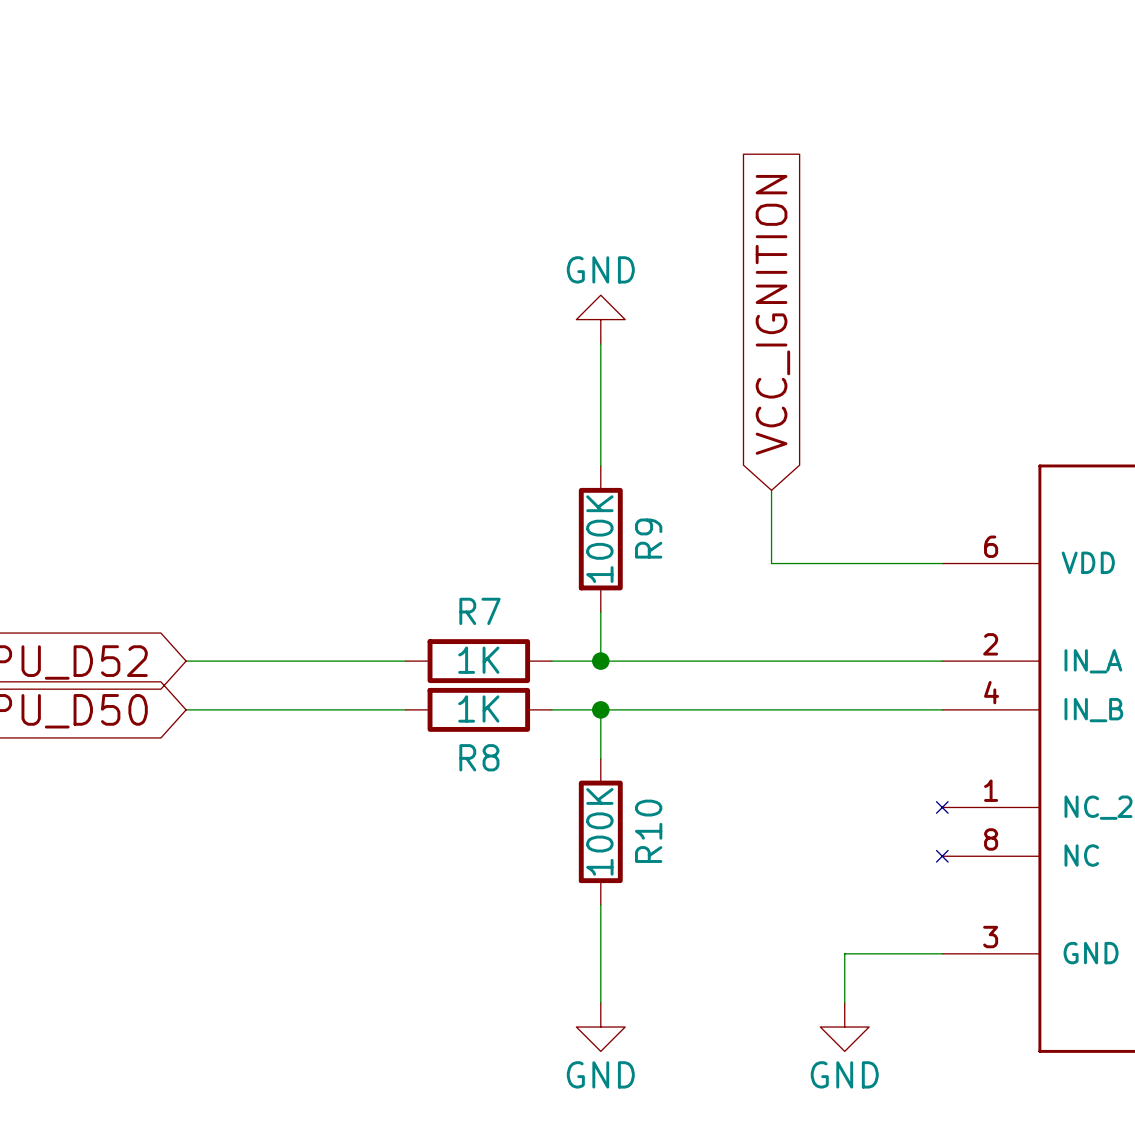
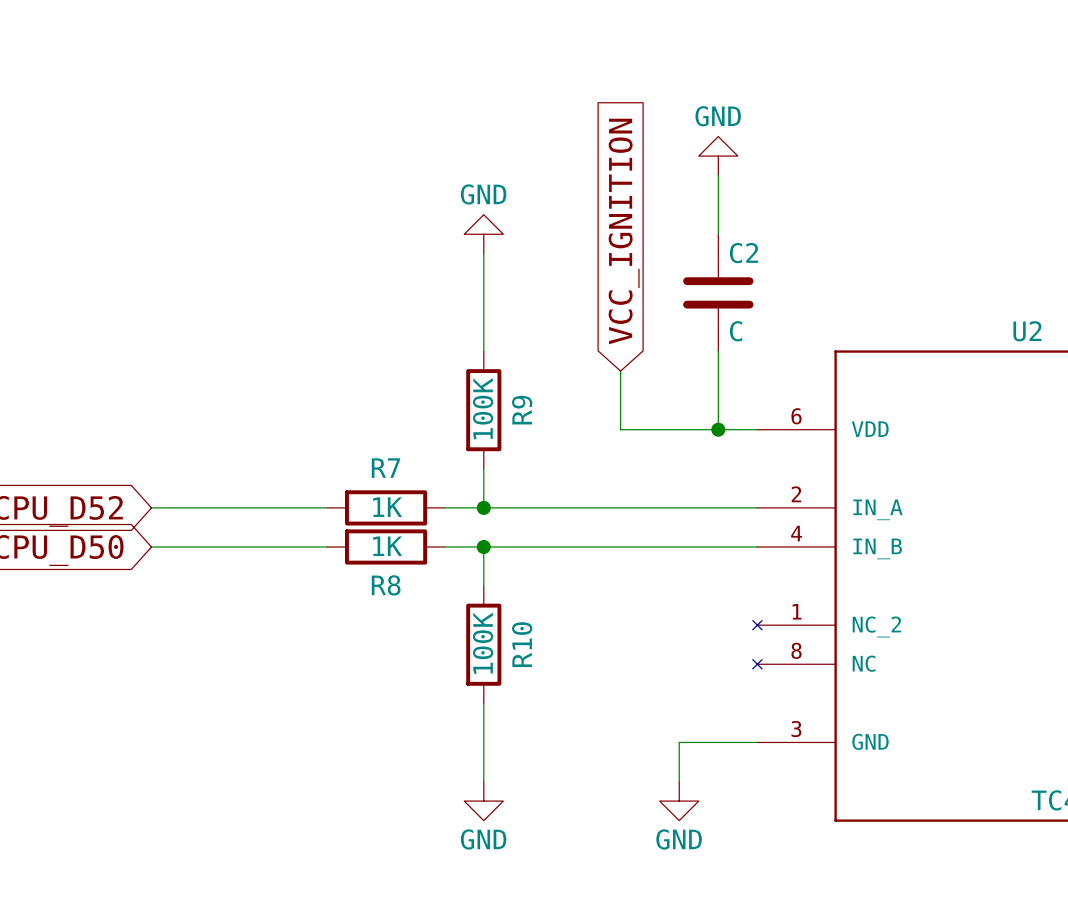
power symbol: none -> GND (718, 156)
wire: none -> (718, 175) (718, 234)
C2: none -> C (718, 292)
wire: none -> (718, 351) (718, 429)
junction: none -> (718, 429)

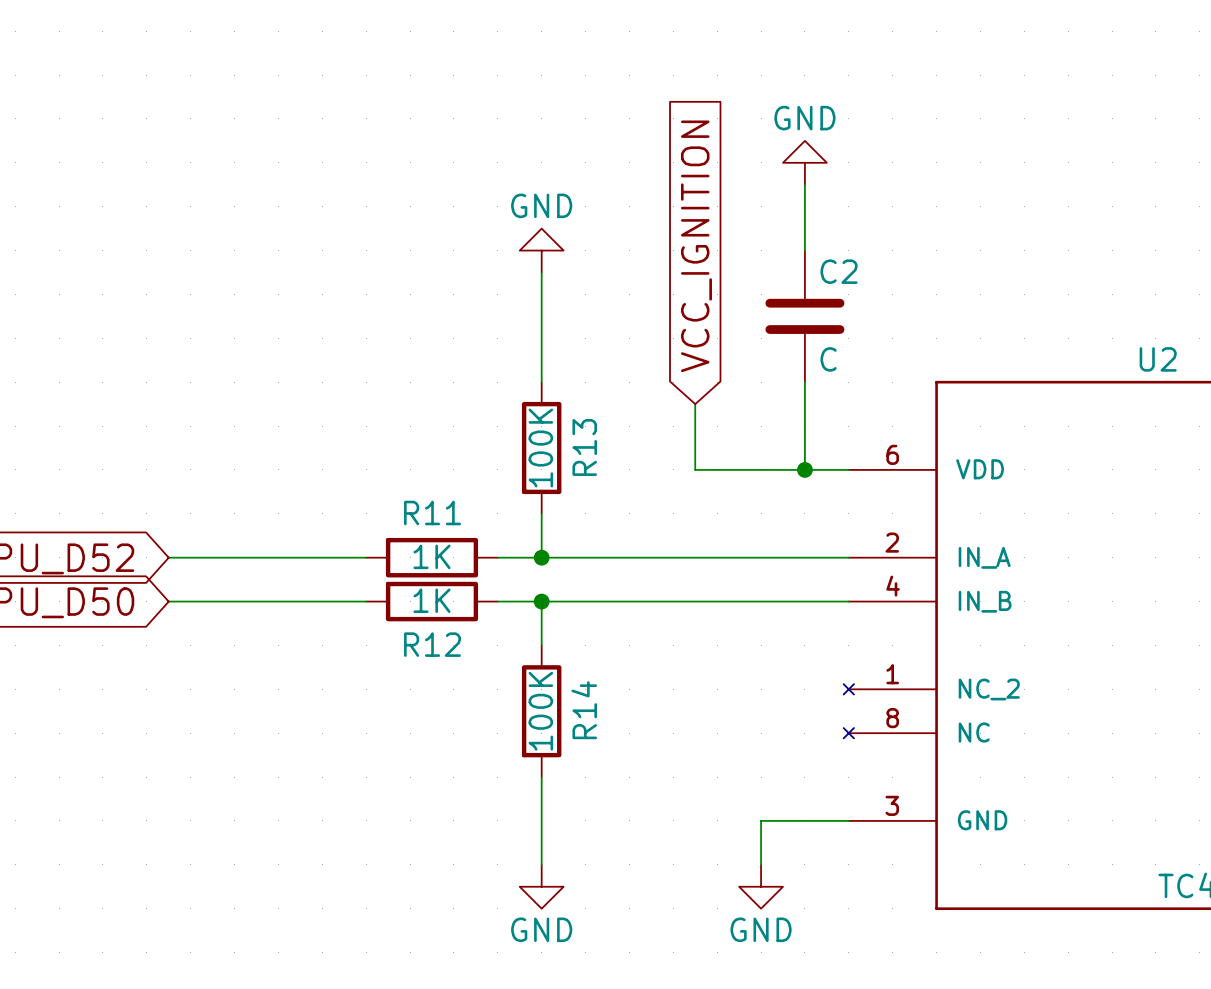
R9 name: R9 (522, 410) -> R13 (584, 447)
R7 name: R7 (385, 468) -> R11 (432, 512)
R8 name: R8 (386, 585) -> R12 (432, 644)
R10 name: R10 (522, 644) -> R14 (584, 710)

